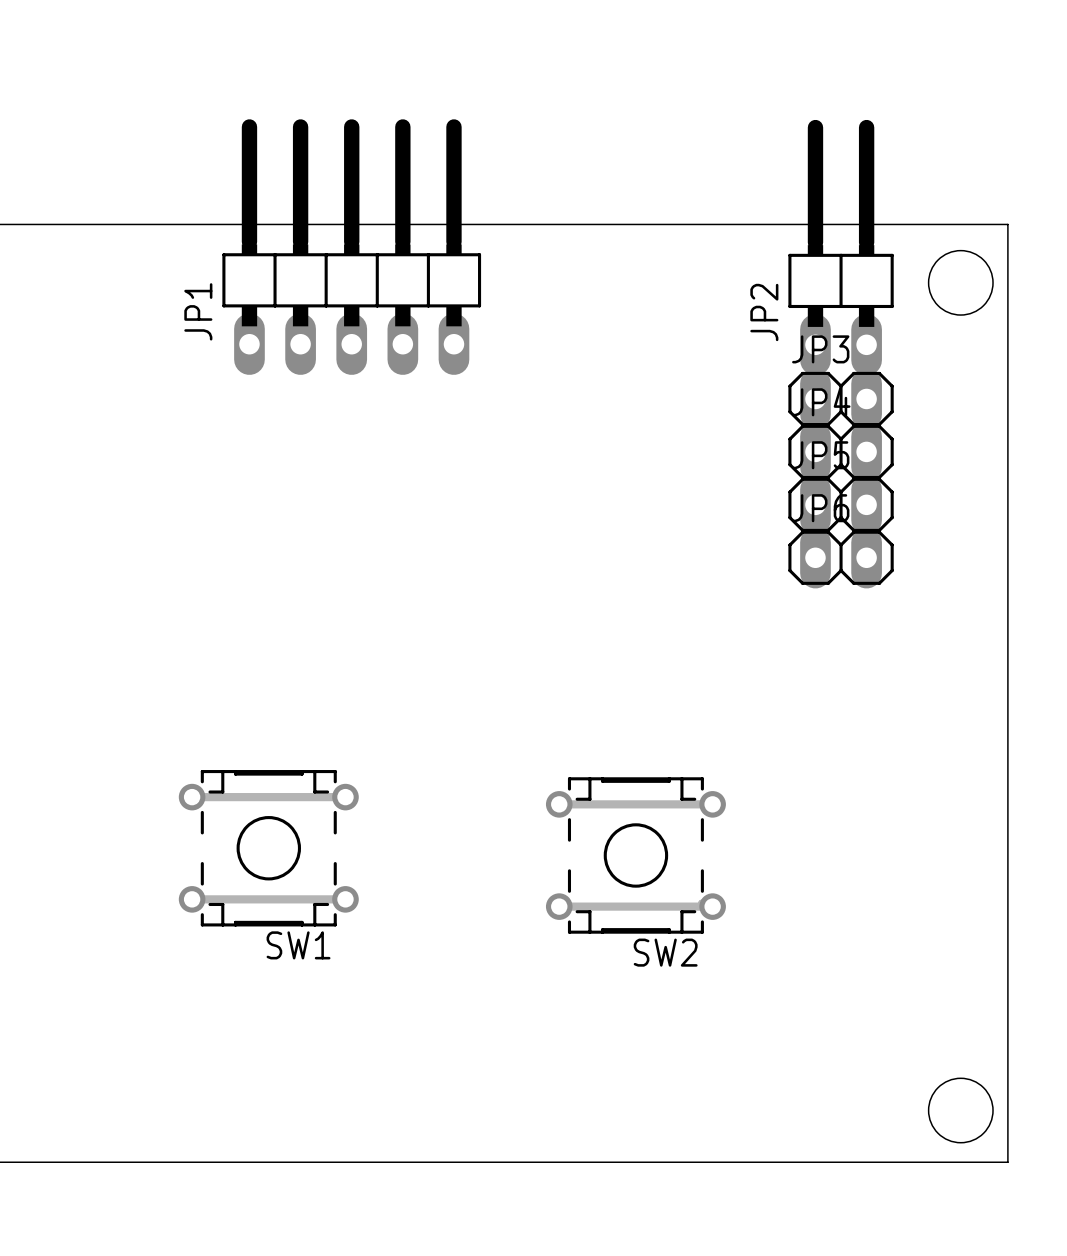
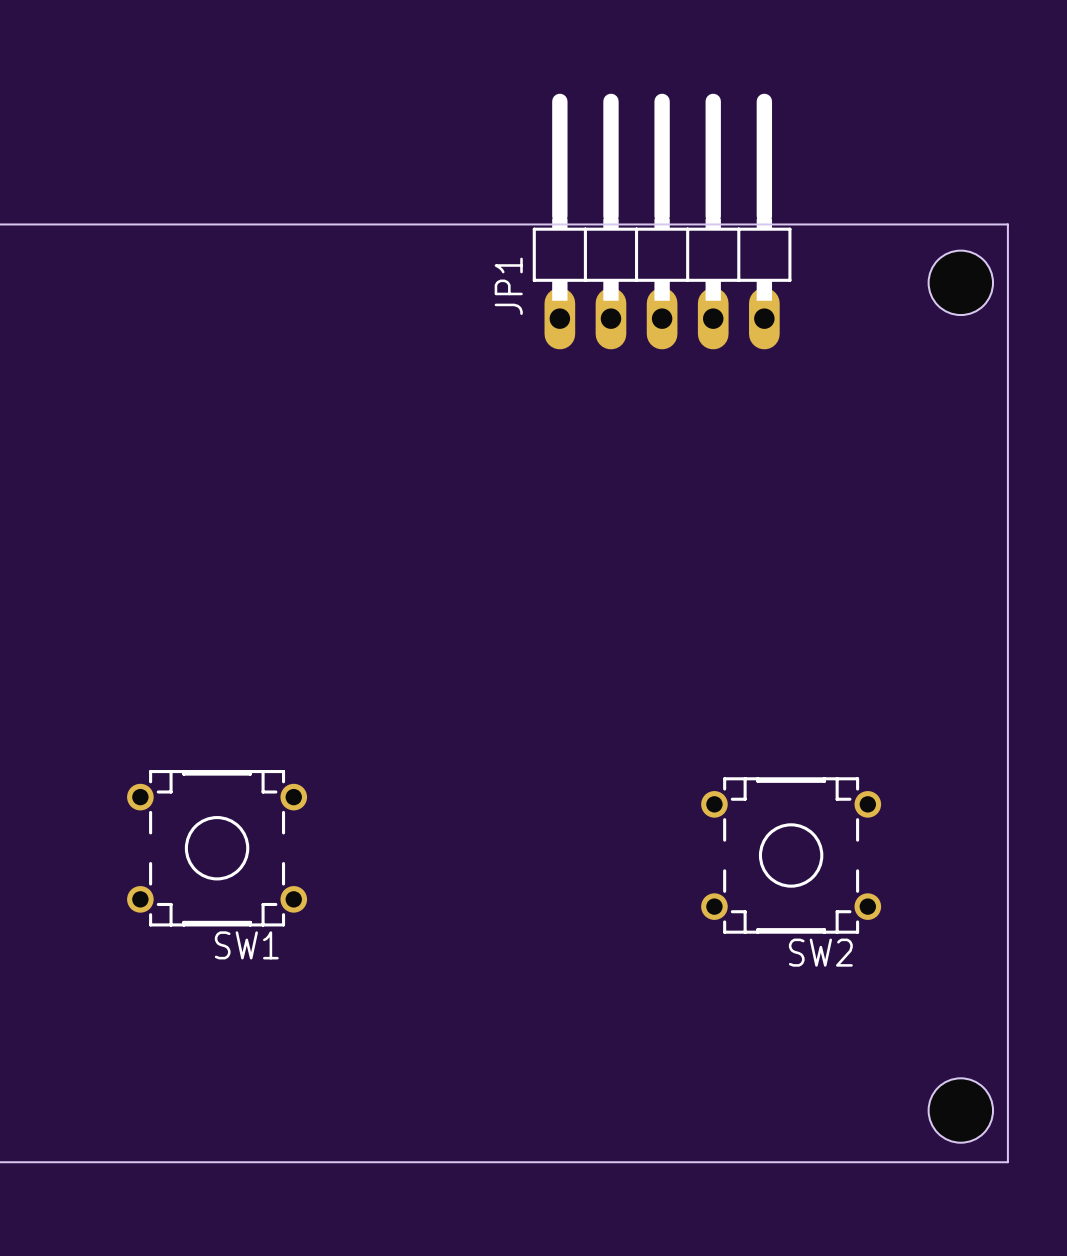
JP1 position: (351, 247) -> (662, 221)
JP2: (841, 247) -> none
JP3: (841, 398) -> none
JP4: (841, 451) -> none
JP5: (841, 504) -> none
JP6: (841, 557) -> none
track: (192, 797) (340, 797) (340, 800) (345, 800) (345, 797) -> none
track: (559, 804) (712, 804) -> none
SW1 position: (268, 848) -> (217, 848)
SW2 position: (635, 855) -> (791, 855)
track: (192, 899) (345, 899) -> none
track: (559, 906) (702, 906) (702, 903) (712, 903) (712, 906) -> none

